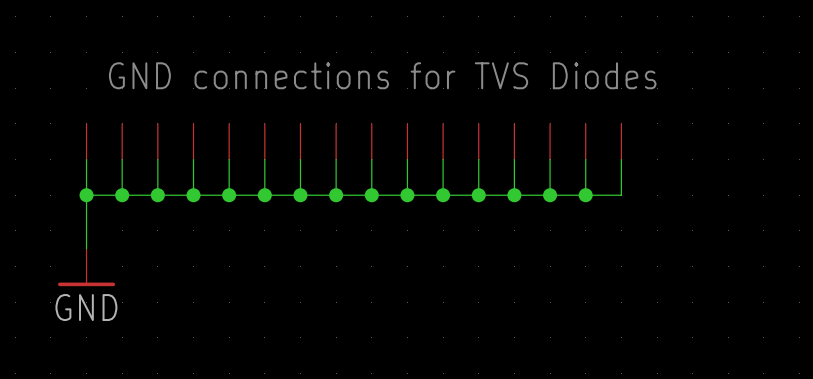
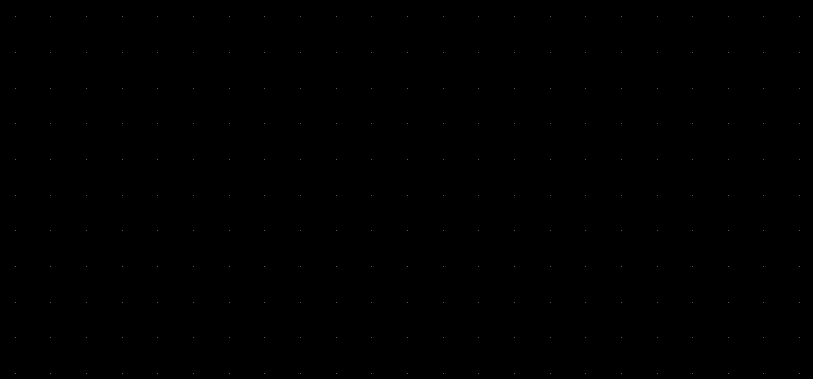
text: GND connections for TVS Diodes (382, 75) -> none
part: (86, 141) -> none
part: (122, 141) -> none
part: (157, 141) -> none
part: (193, 141) -> none
part: (229, 141) -> none
part: (264, 141) -> none
part: (300, 141) -> none
part: (336, 141) -> none
part: (371, 141) -> none
part: (407, 141) -> none
part: (443, 141) -> none
part: (478, 141) -> none
part: (514, 141) -> none
part: (550, 141) -> none
part: (585, 141) -> none
part: (621, 141) -> none
wire: (86, 159) (86, 248) -> none
wire: (122, 159) (122, 195) -> none
wire: (157, 159) (157, 195) -> none
wire: (193, 159) (193, 195) -> none
wire: (229, 159) (229, 195) -> none
wire: (264, 159) (264, 195) -> none
wire: (300, 159) (300, 195) -> none
wire: (336, 159) (336, 195) -> none
wire: (371, 159) (371, 195) -> none
wire: (407, 159) (407, 195) -> none
wire: (443, 159) (443, 195) -> none
wire: (478, 159) (478, 195) -> none
wire: (514, 159) (514, 195) -> none
wire: (550, 159) (550, 195) -> none
wire: (585, 159) (585, 195) -> none
wire: (621, 159) (621, 195) (86, 195) -> none
junction: (86, 195) -> none
junction: (122, 195) -> none
junction: (157, 195) -> none
junction: (193, 195) -> none
junction: (229, 195) -> none
junction: (264, 195) -> none
junction: (300, 195) -> none
junction: (336, 195) -> none
junction: (371, 195) -> none
junction: (407, 195) -> none
junction: (443, 195) -> none
junction: (478, 195) -> none
junction: (514, 195) -> none
junction: (550, 195) -> none
junction: (585, 195) -> none
power symbol: GND (86, 267) -> none

